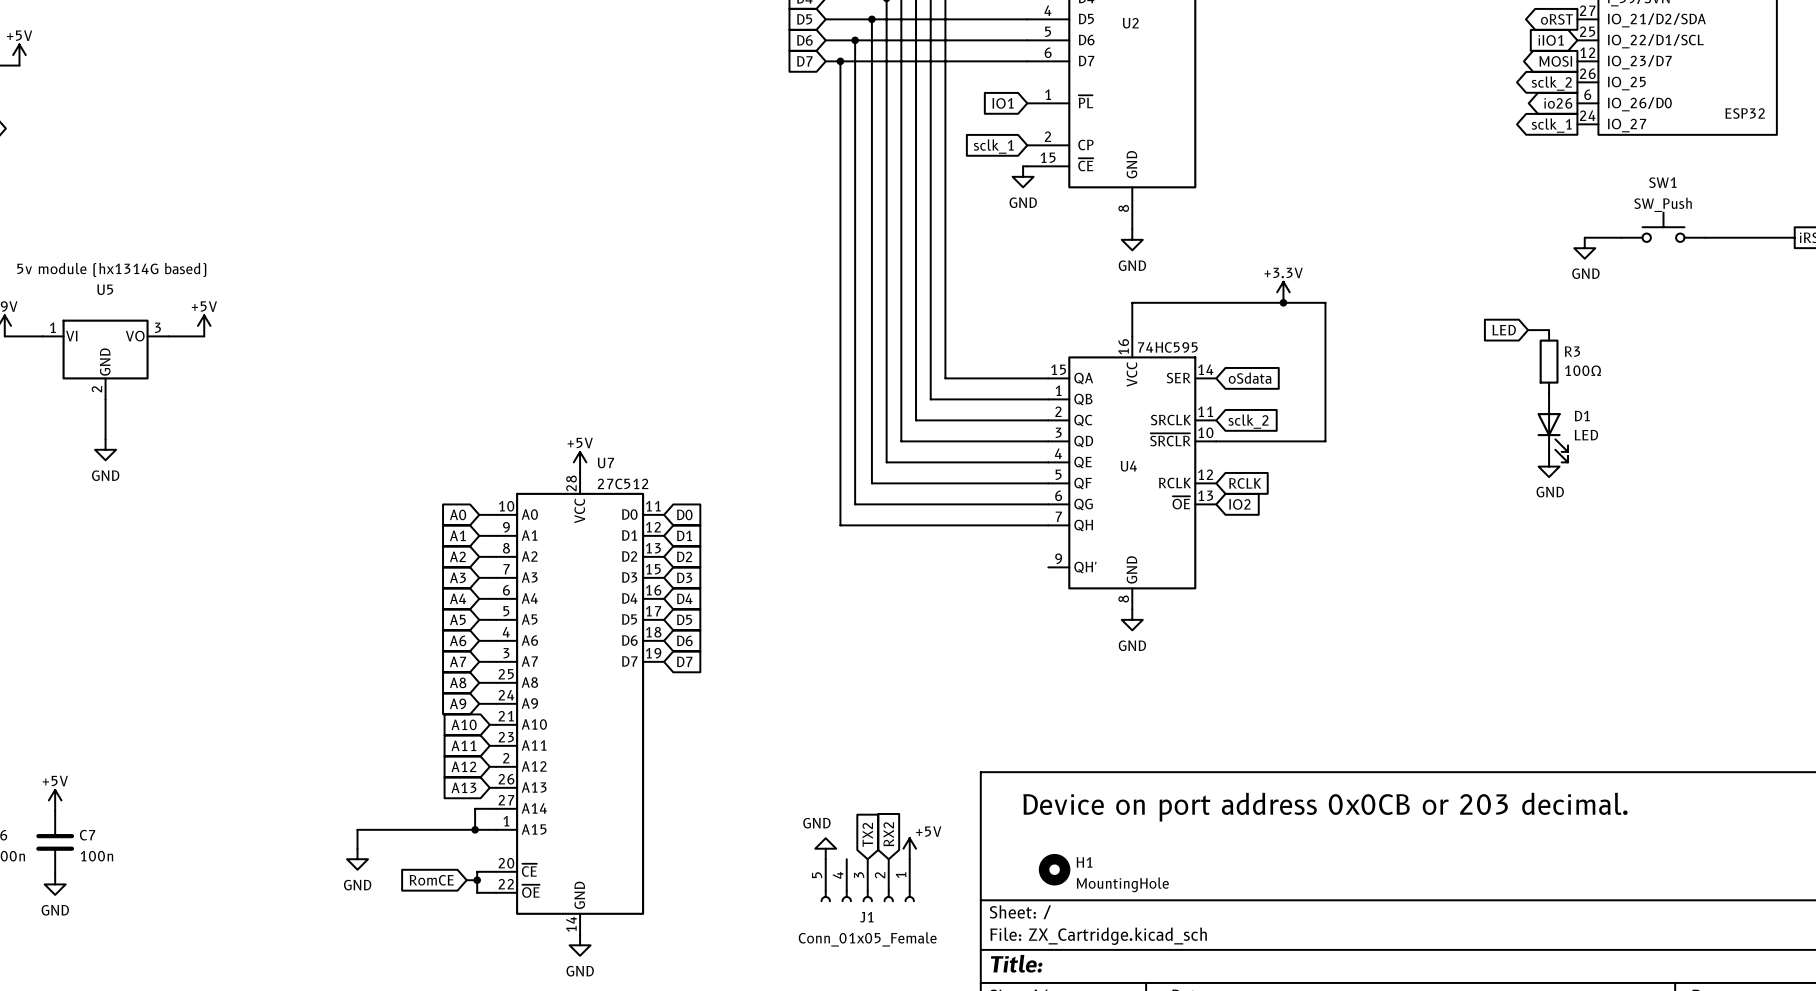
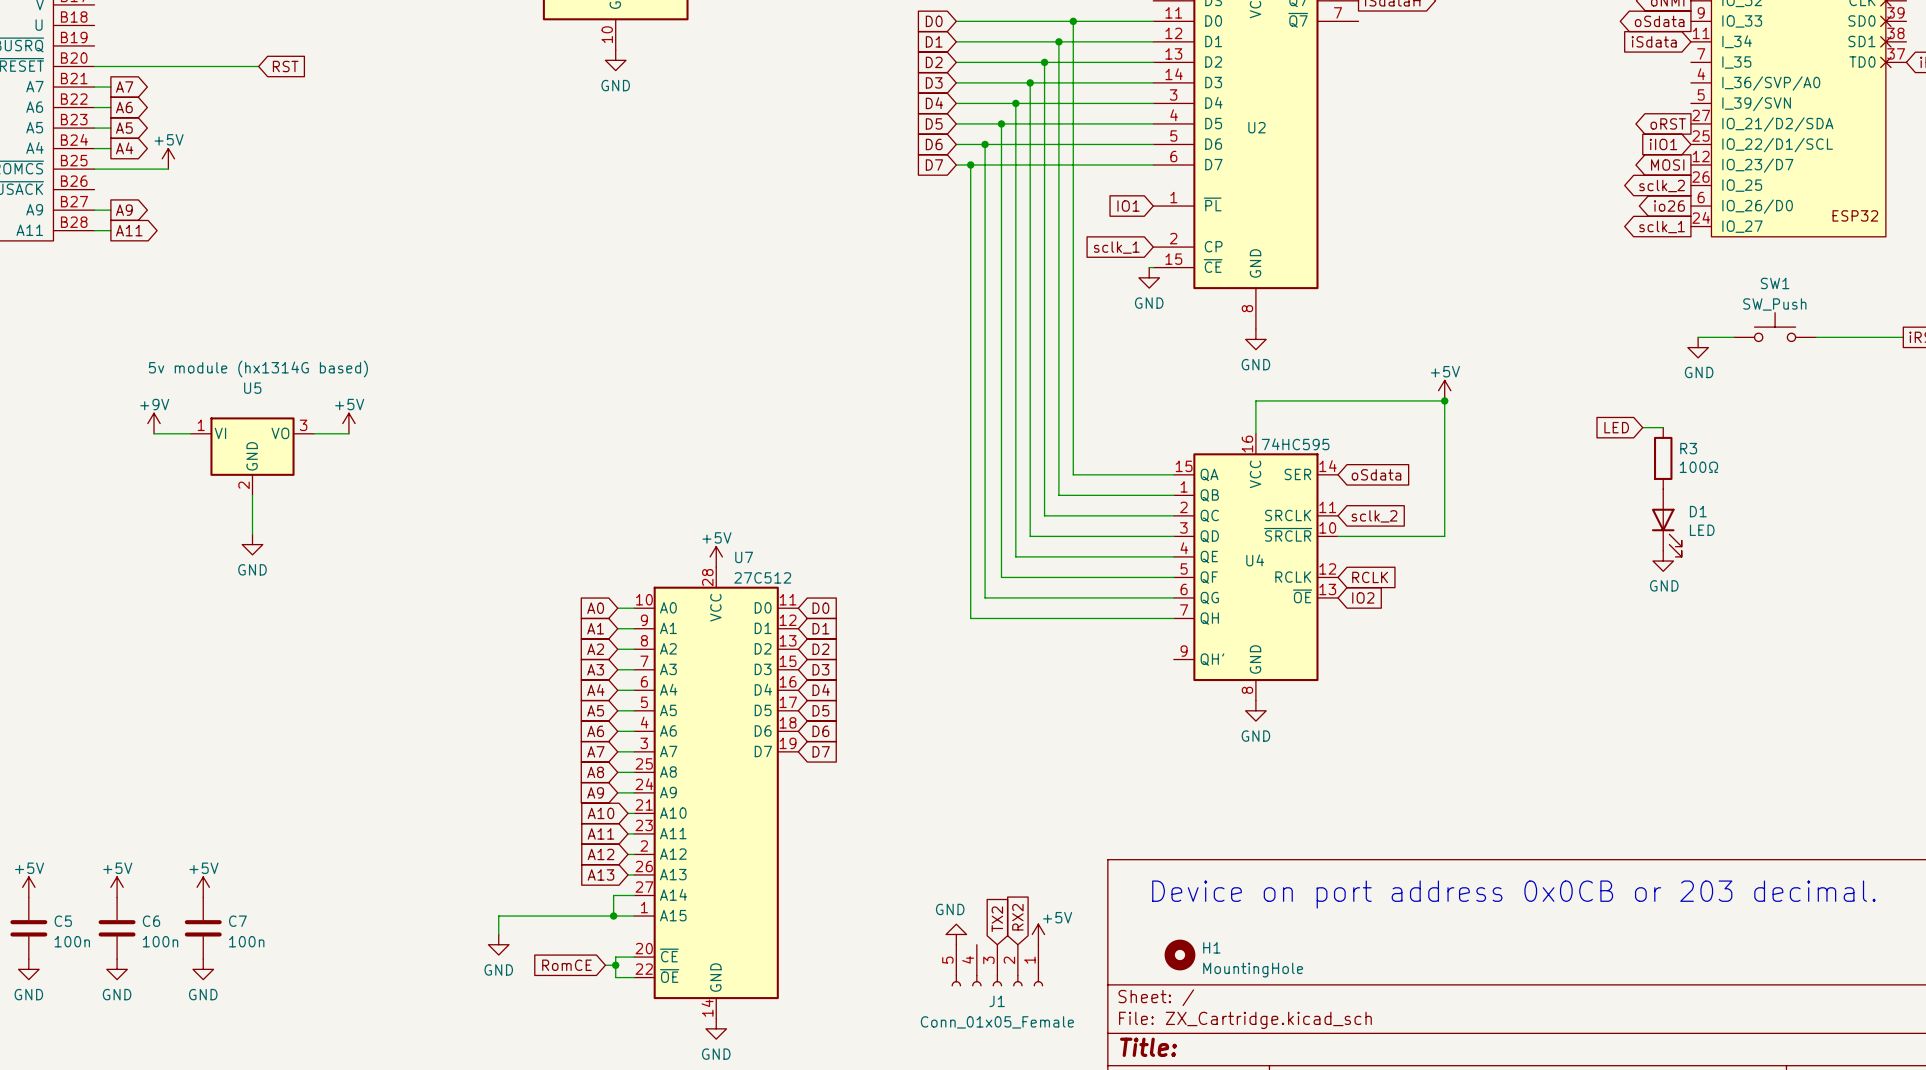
power symbol: +3.3V (1283, 292) -> none
power symbol: none -> +5V (1444, 390)
junction position: (1283, 302) -> (1444, 400)

